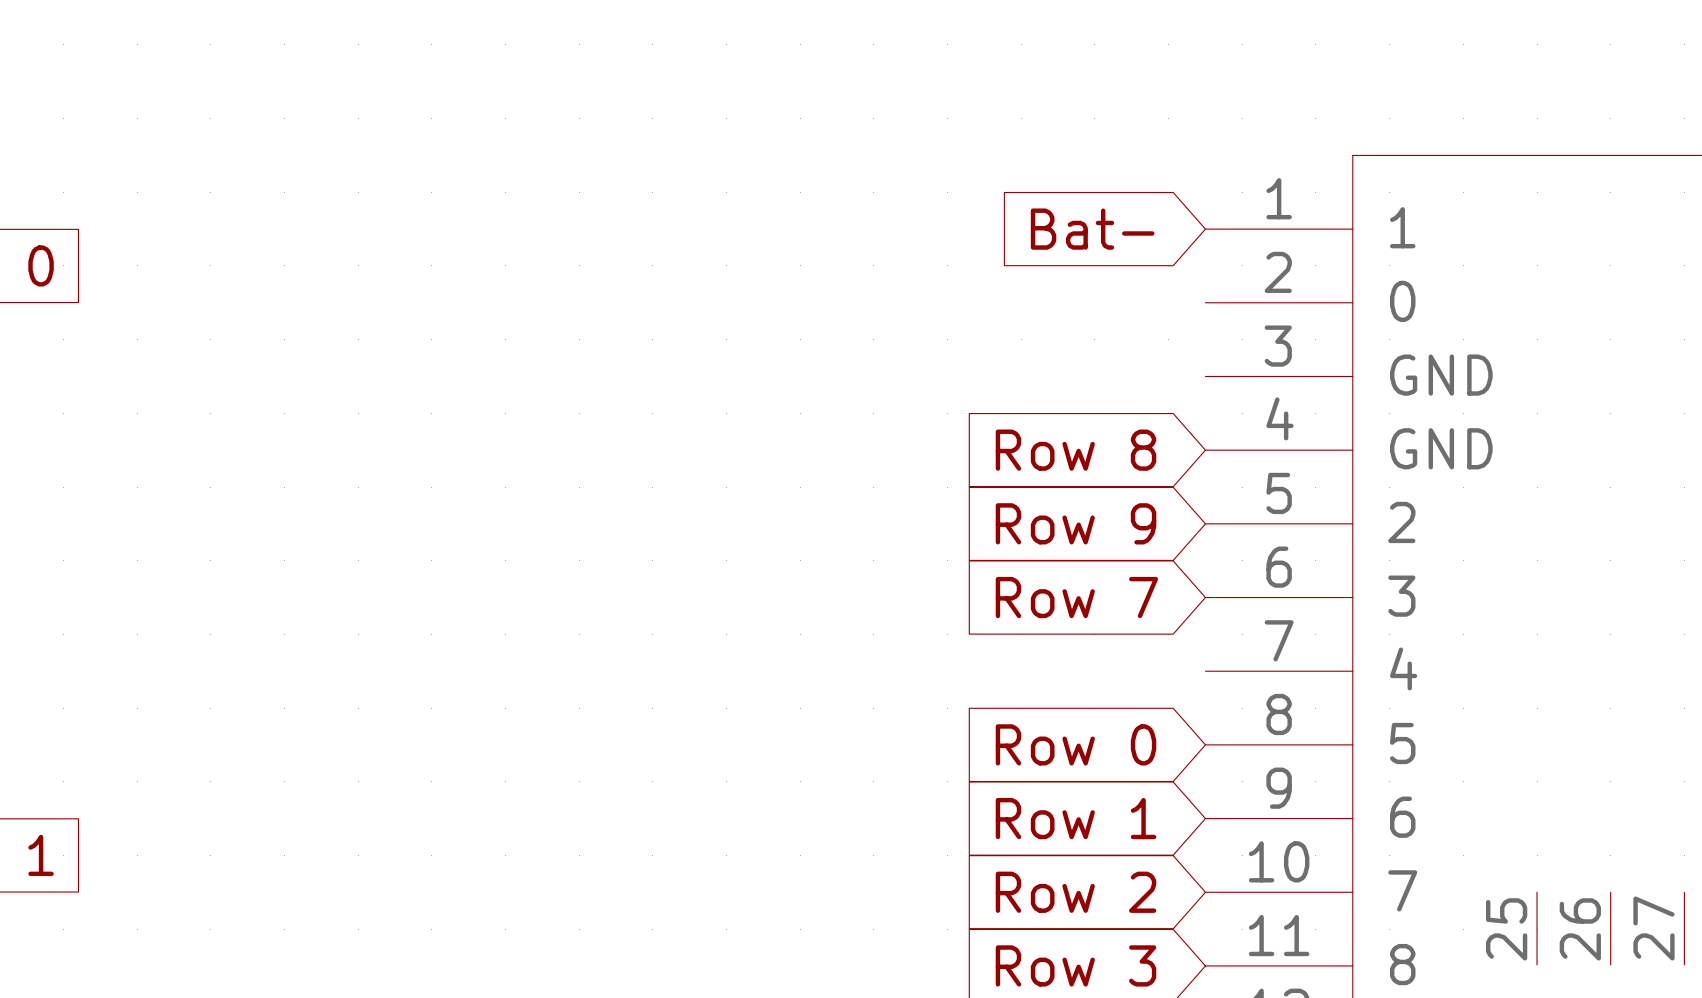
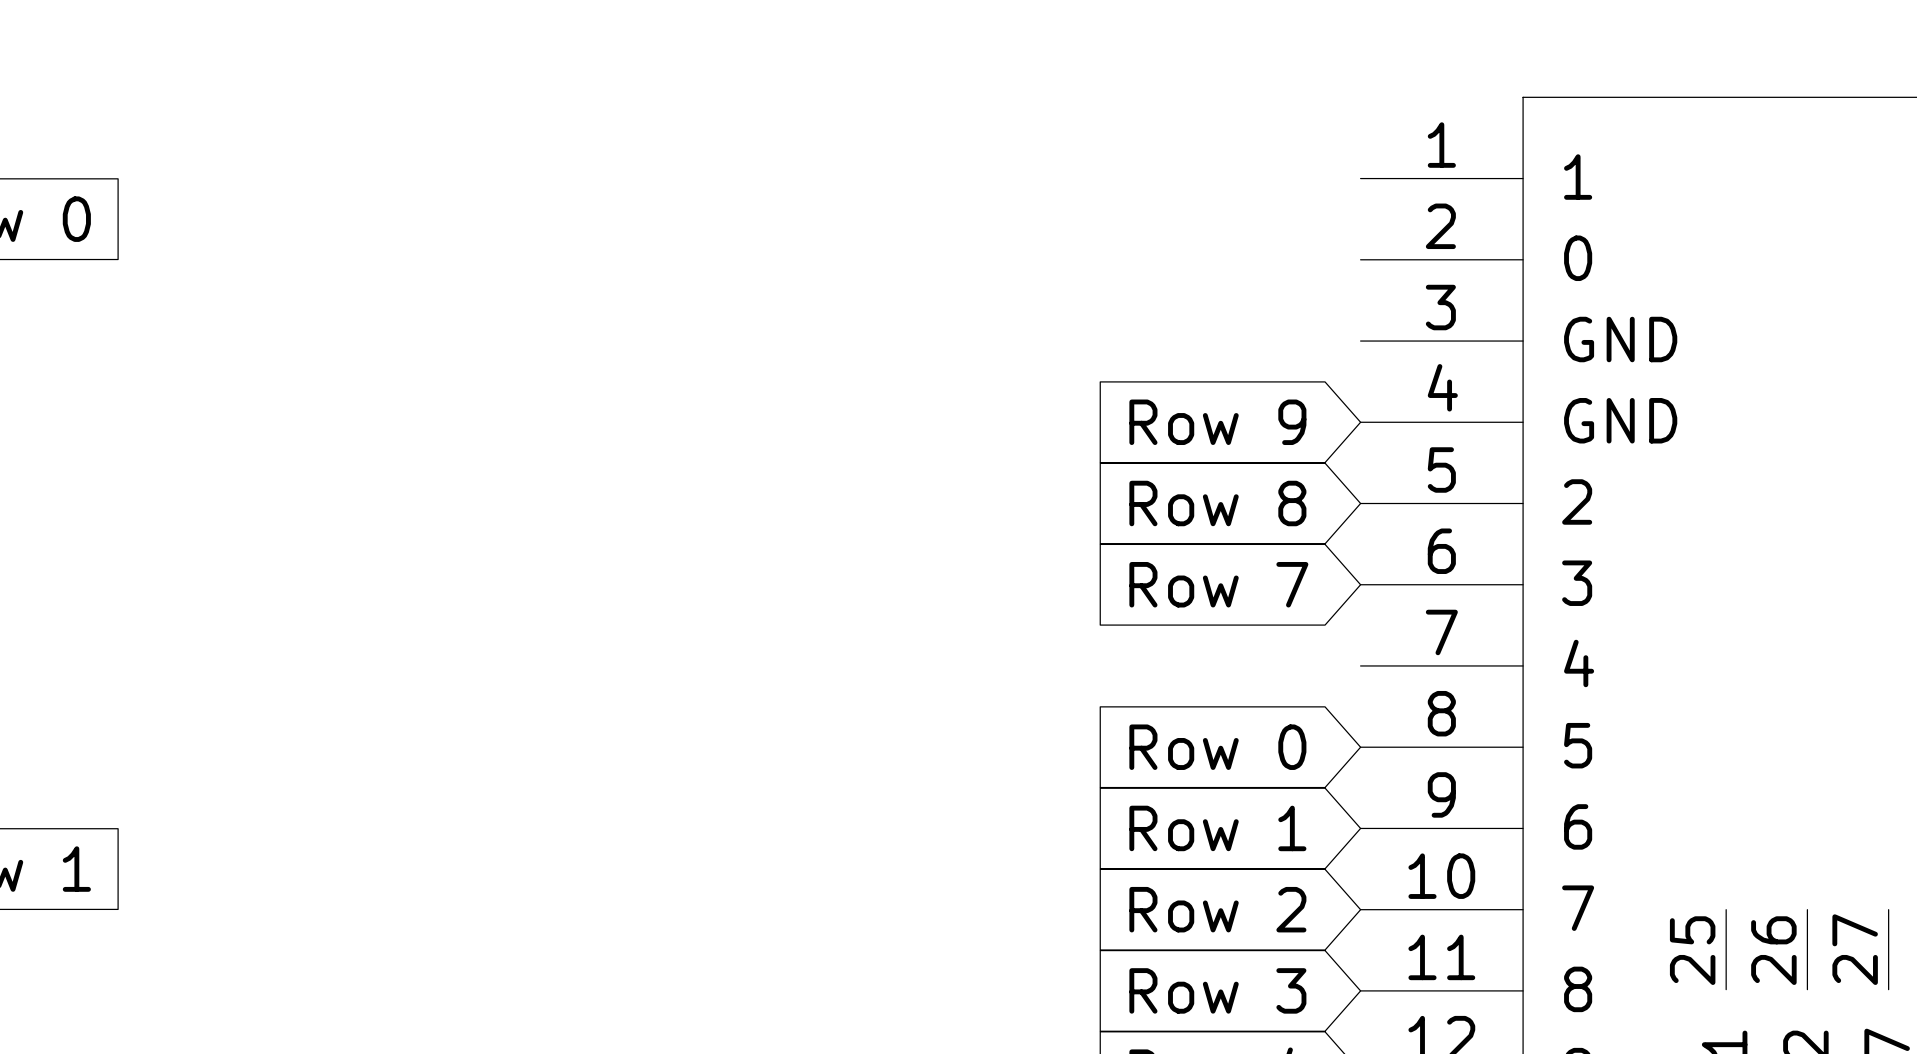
global label: Bat- (1092, 229) -> none
global label: Row 8 (1076, 450) -> Row 9 (1217, 422)
global label: Row 9 (1076, 523) -> Row 8 (1217, 503)

